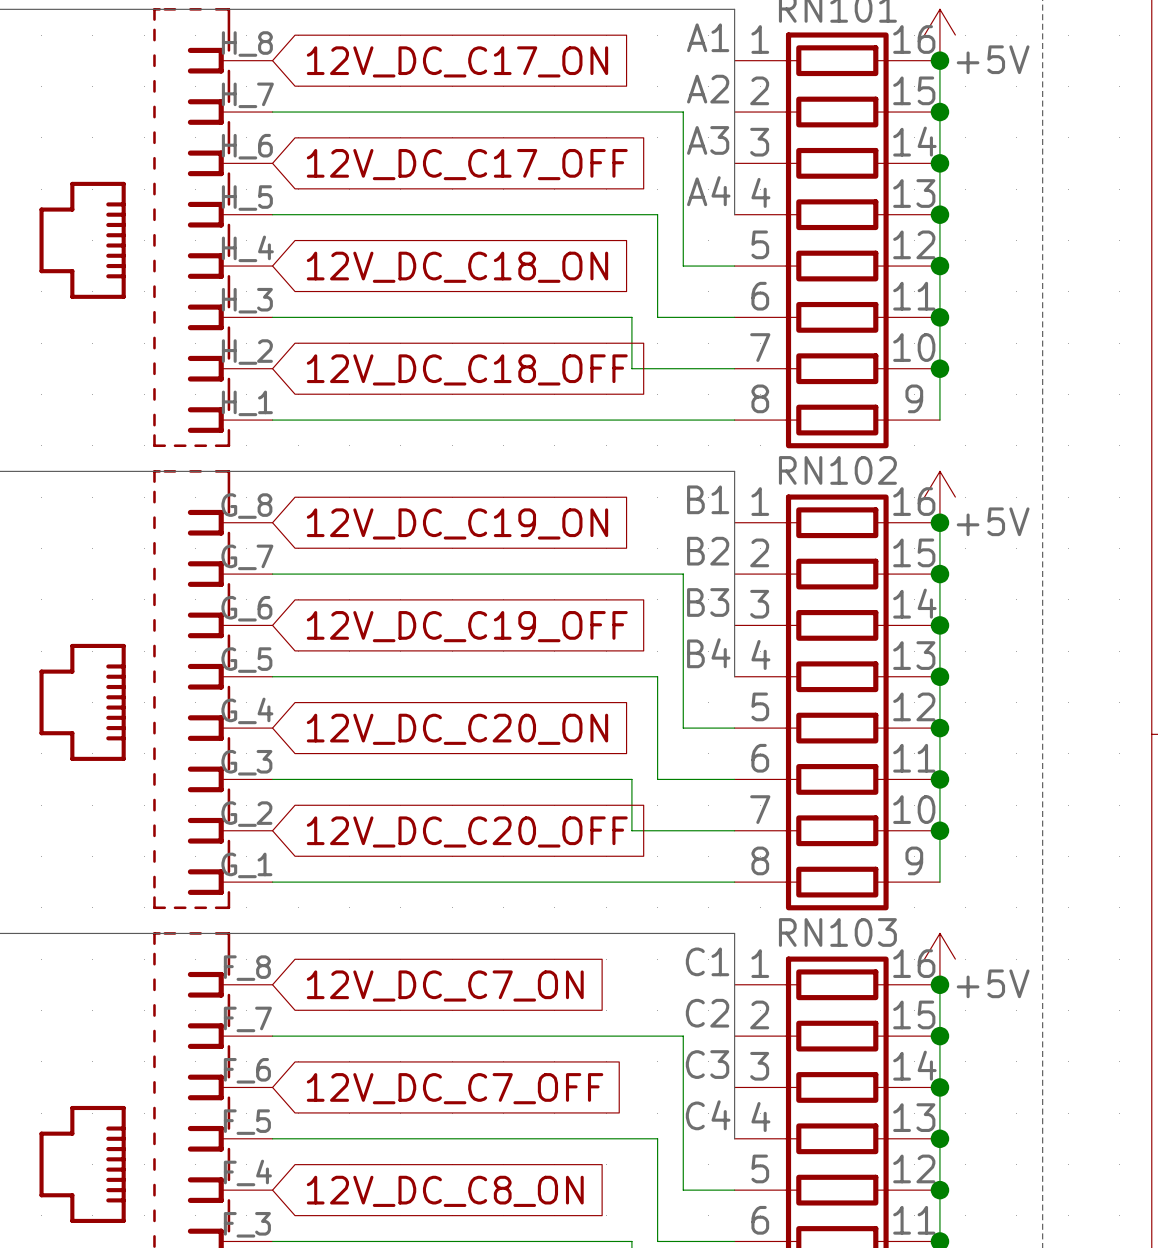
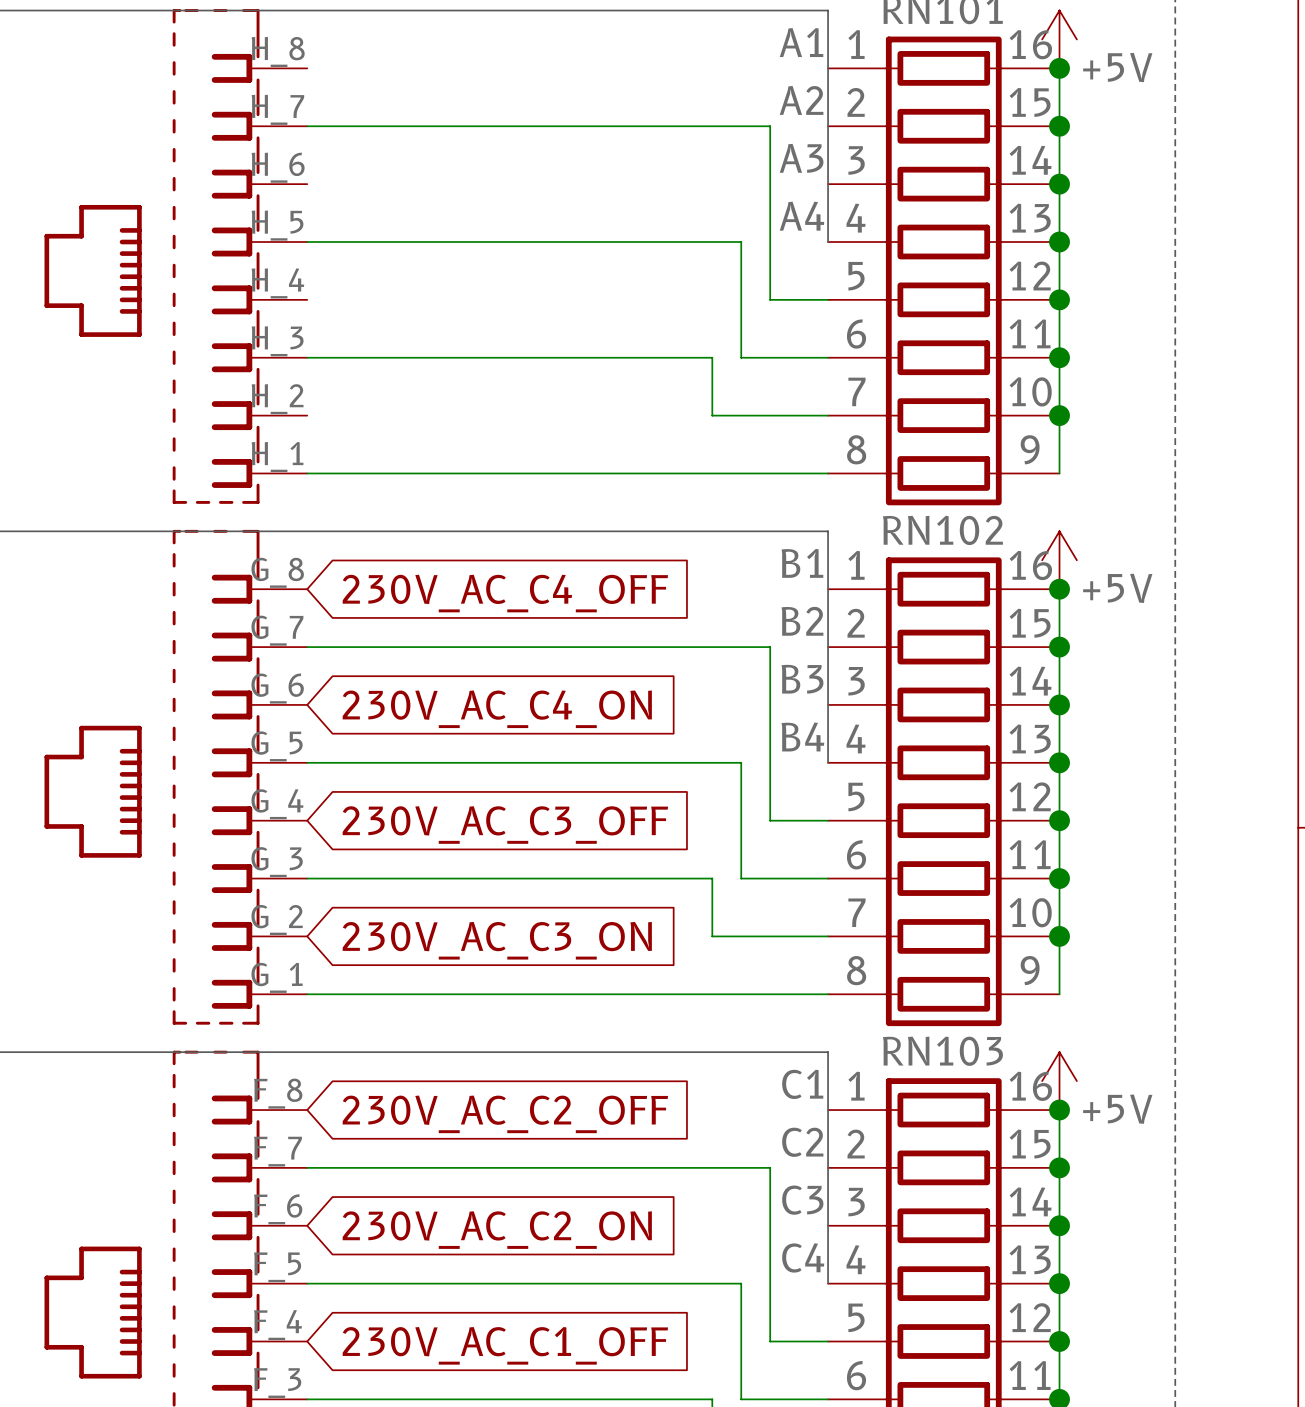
global label: 12V_DC_C17_ON (457, 61) -> none
global label: 12V_DC_C17_OFF (467, 164) -> none
global label: 12V_DC_C18_ON (457, 267) -> none
global label: 12V_DC_C18_OFF (467, 369) -> none
global label: 12V_DC_C19_ON (457, 523) -> 230V_AC_C4_OFF (505, 593)
global label: 12V_DC_C19_OFF (467, 626) -> 230V_AC_C4_ON (497, 709)
global label: 12V_DC_C20_ON (457, 729) -> 230V_AC_C3_OFF (505, 825)
global label: 12V_DC_C20_OFF (467, 831) -> 230V_AC_C3_ON (497, 940)
global label: 12V_DC_C7_ON (445, 986) -> 230V_AC_C2_OFF (505, 1114)
global label: 12V_DC_C7_OFF (455, 1088) -> 230V_AC_C2_ON (497, 1230)
global label: 12V_DC_C8_ON (445, 1191) -> 230V_AC_C1_OFF (505, 1345)

